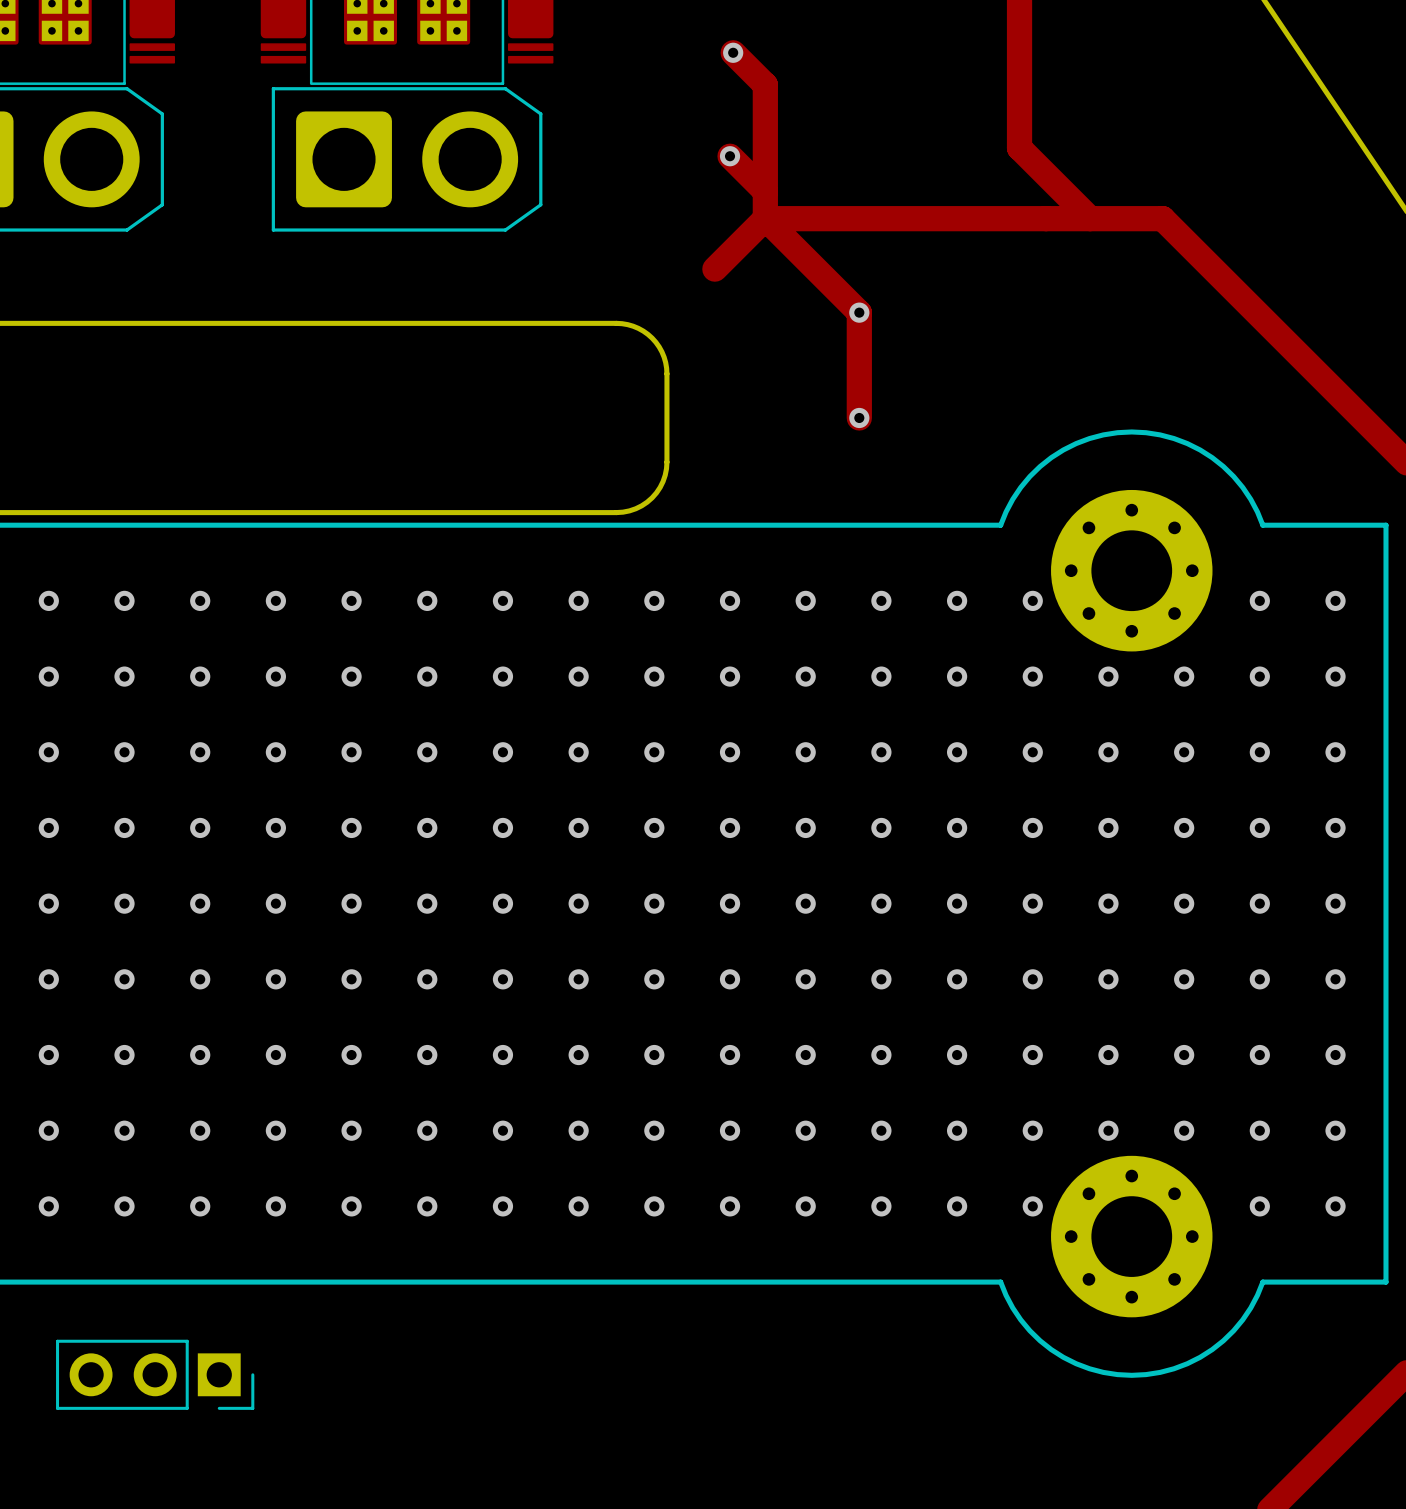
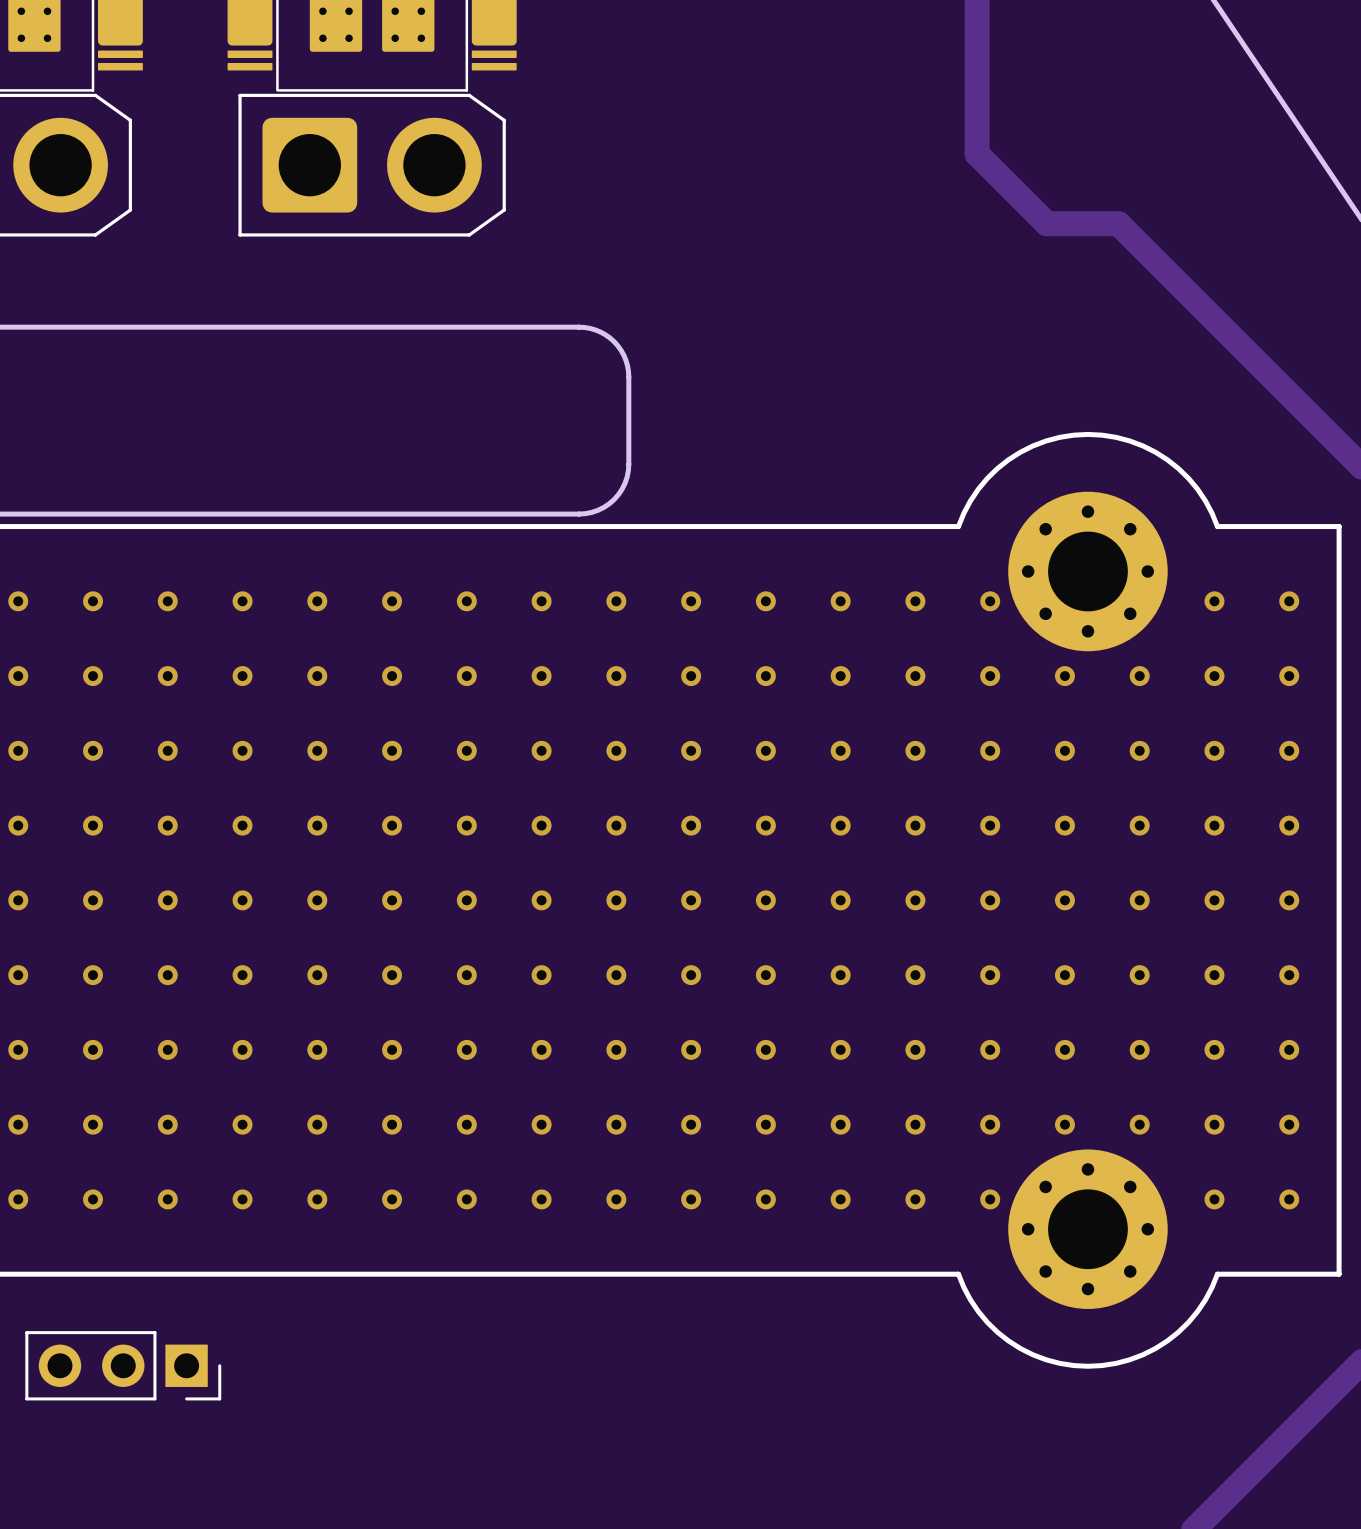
track: (733, 52) (765, 84) (765, 218) -> none
via: (733, 52) -> none
track: (730, 156) (765, 191) -> none
via: (730, 156) -> none
track: (765, 218) (1090, 218) -> none
track: (765, 218) (859, 312) (859, 417) -> none
track: (765, 218) (714, 269) -> none
via: (859, 312) -> none
via: (859, 417) -> none

